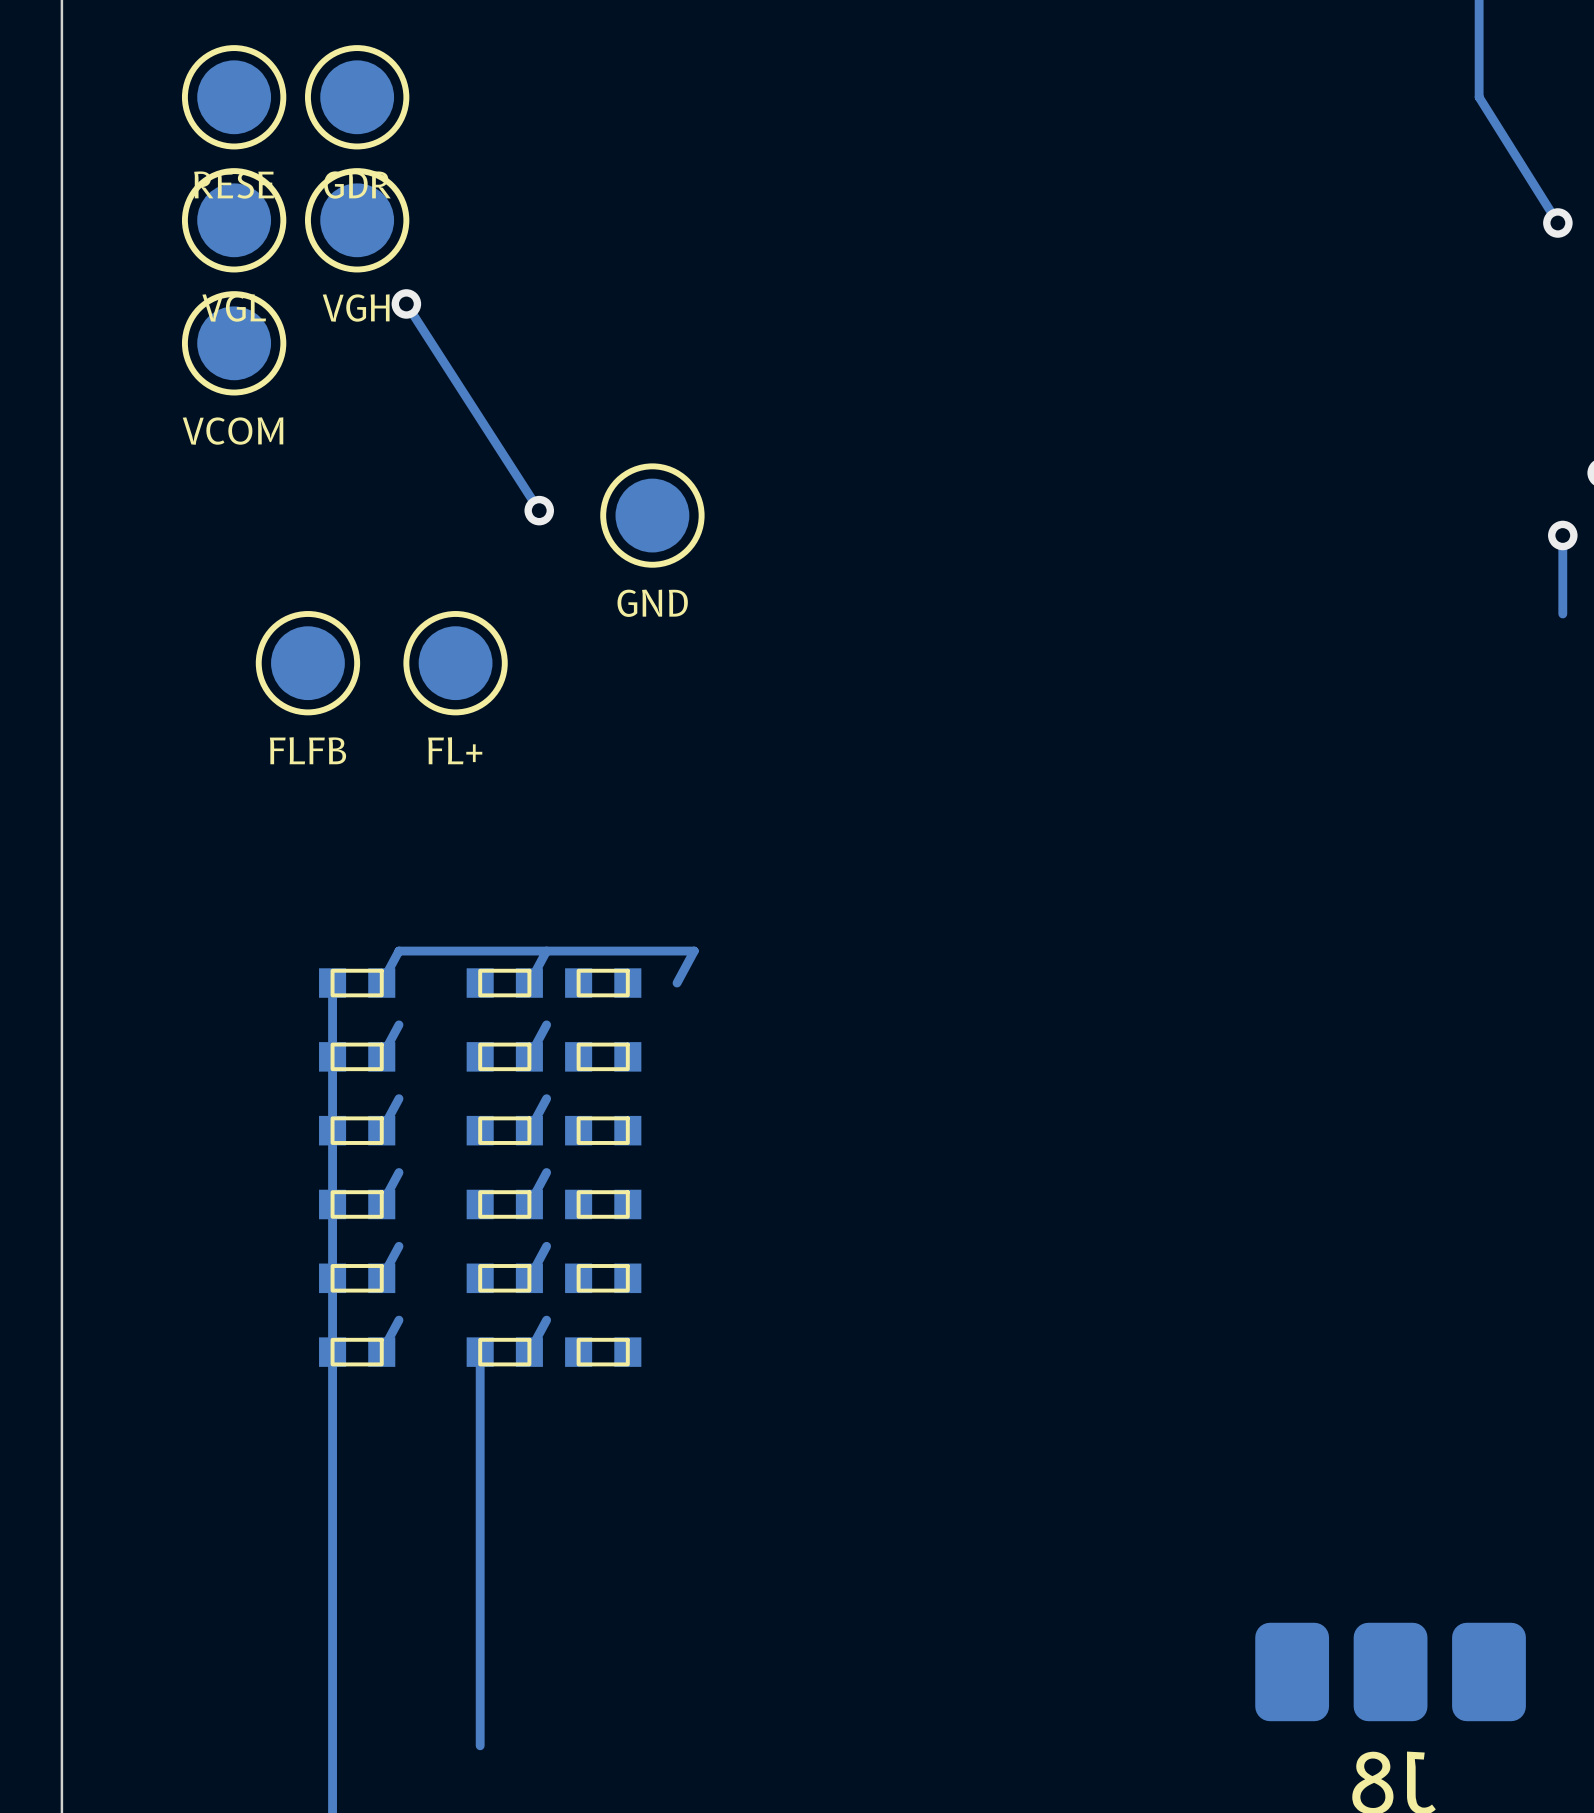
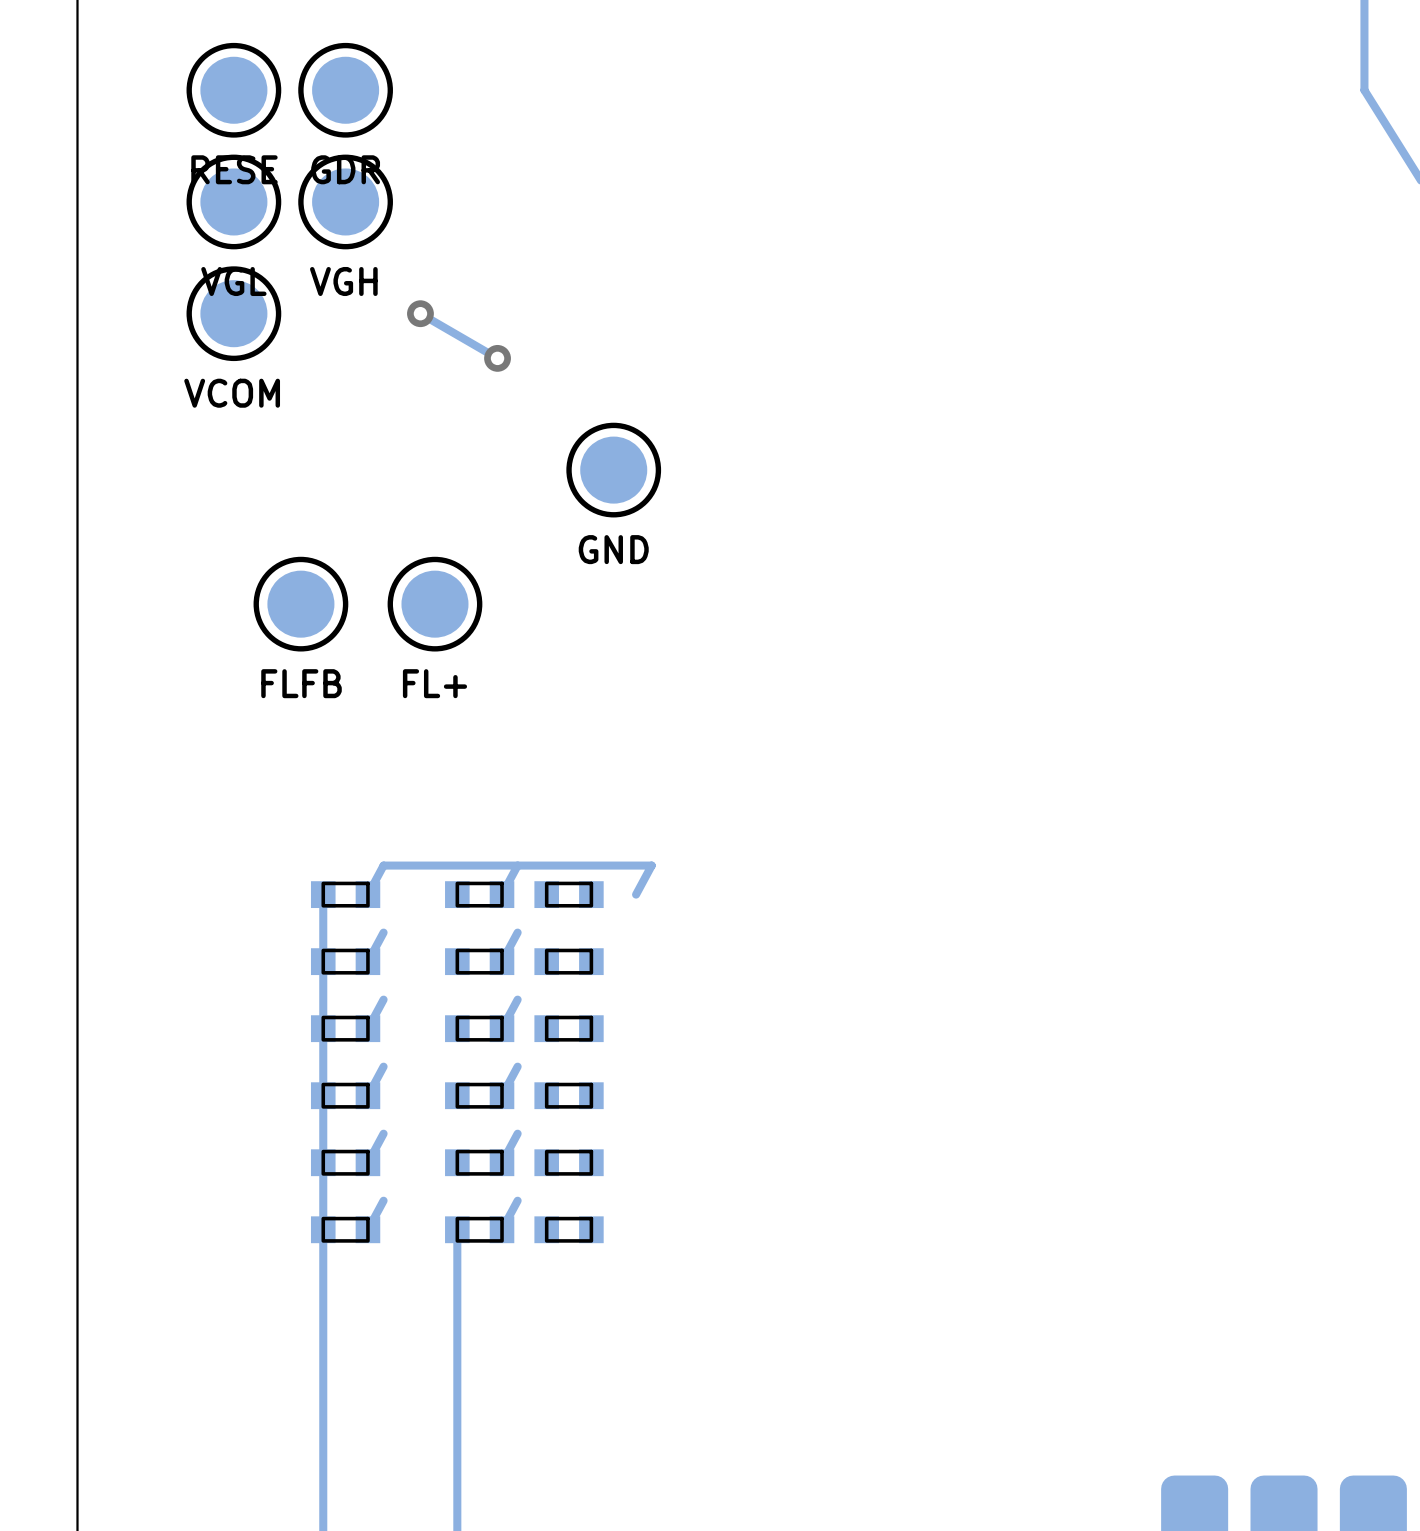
track: (406, 303) (539, 510) -> none
via position: (406, 303) -> (420, 313)
track: none -> (420, 313) (497, 358)
via: none -> (497, 358)
via: (539, 510) -> none

